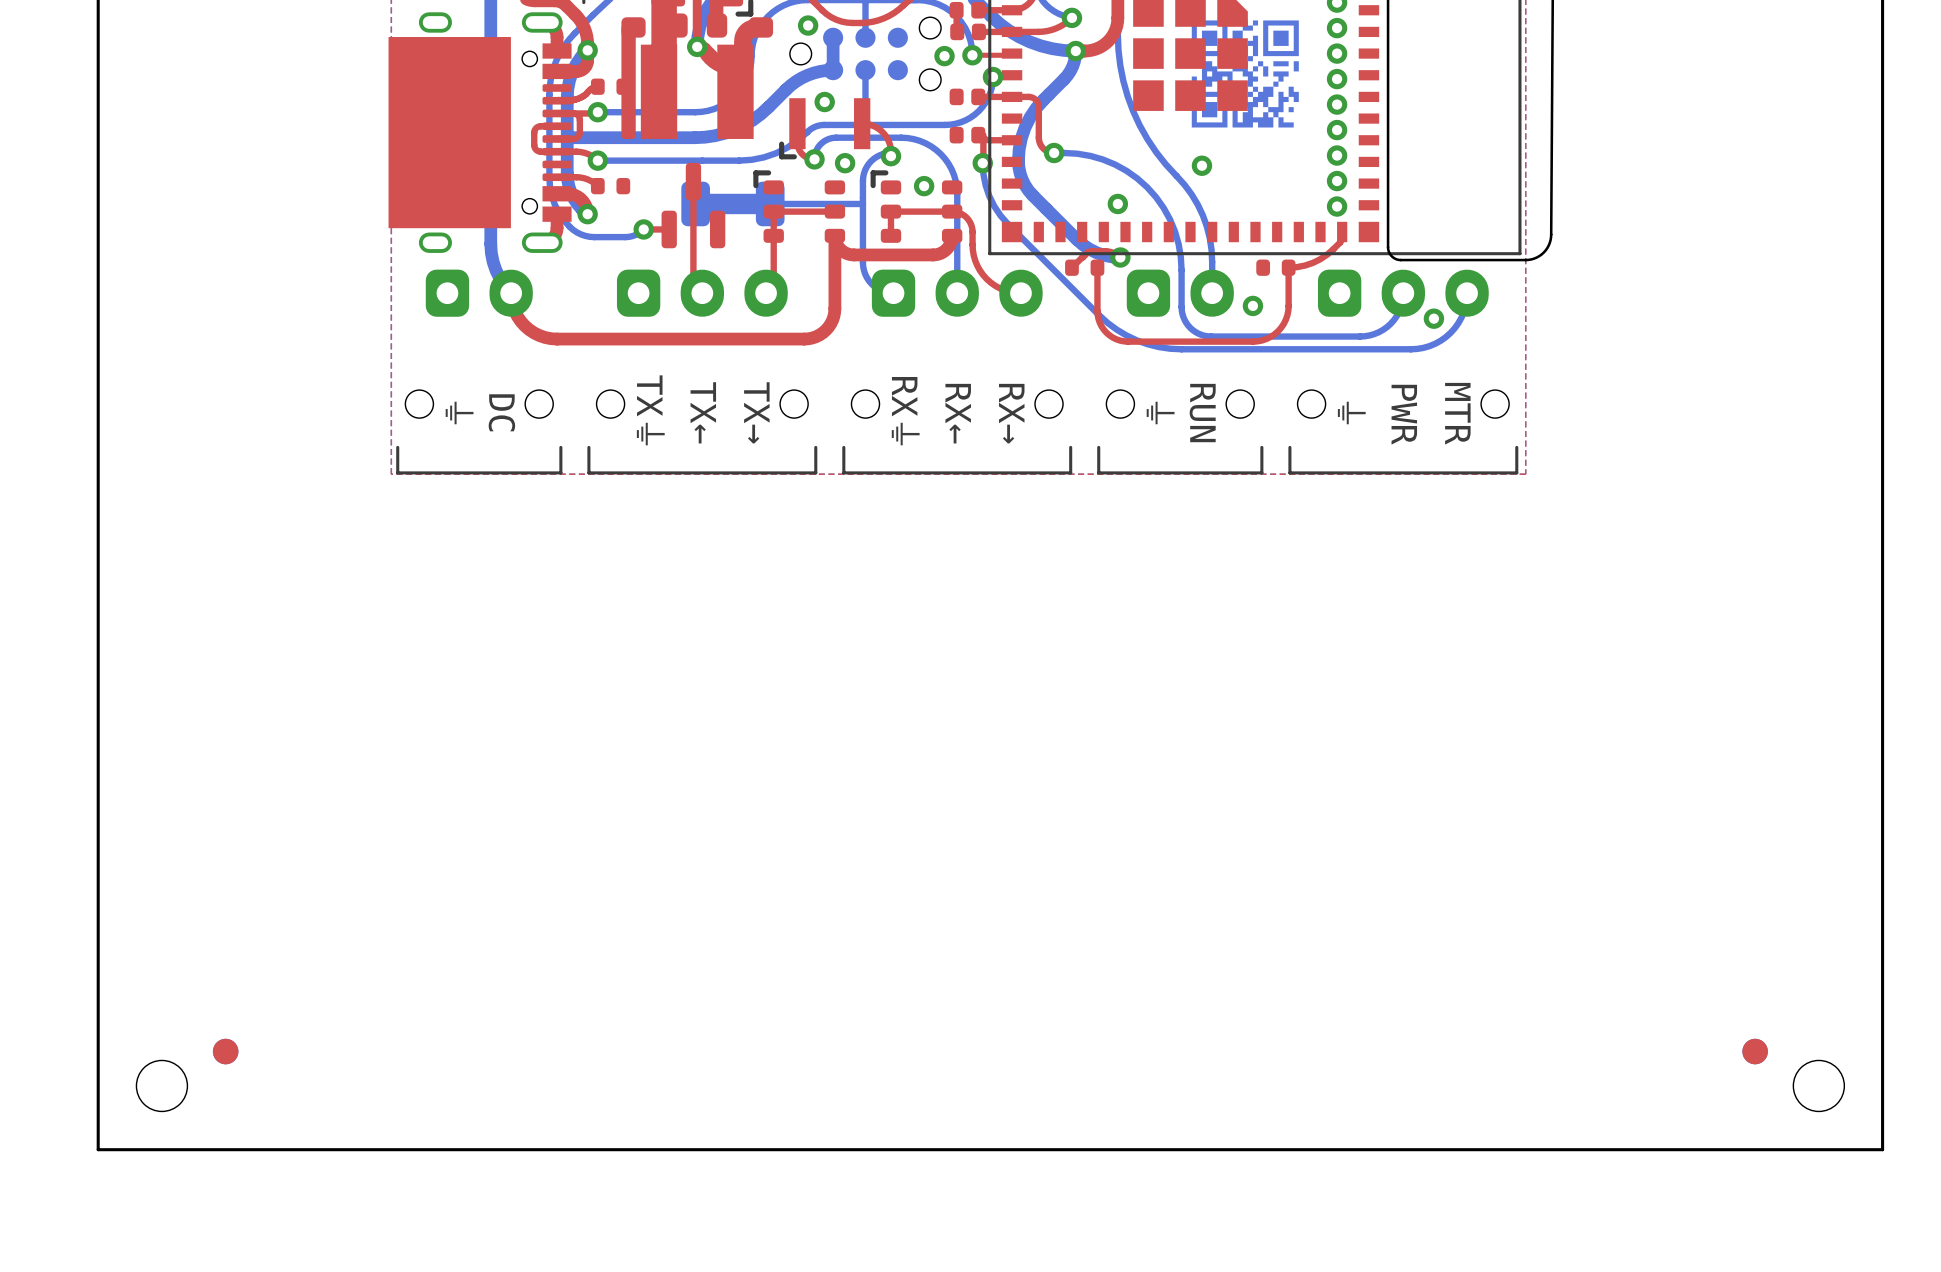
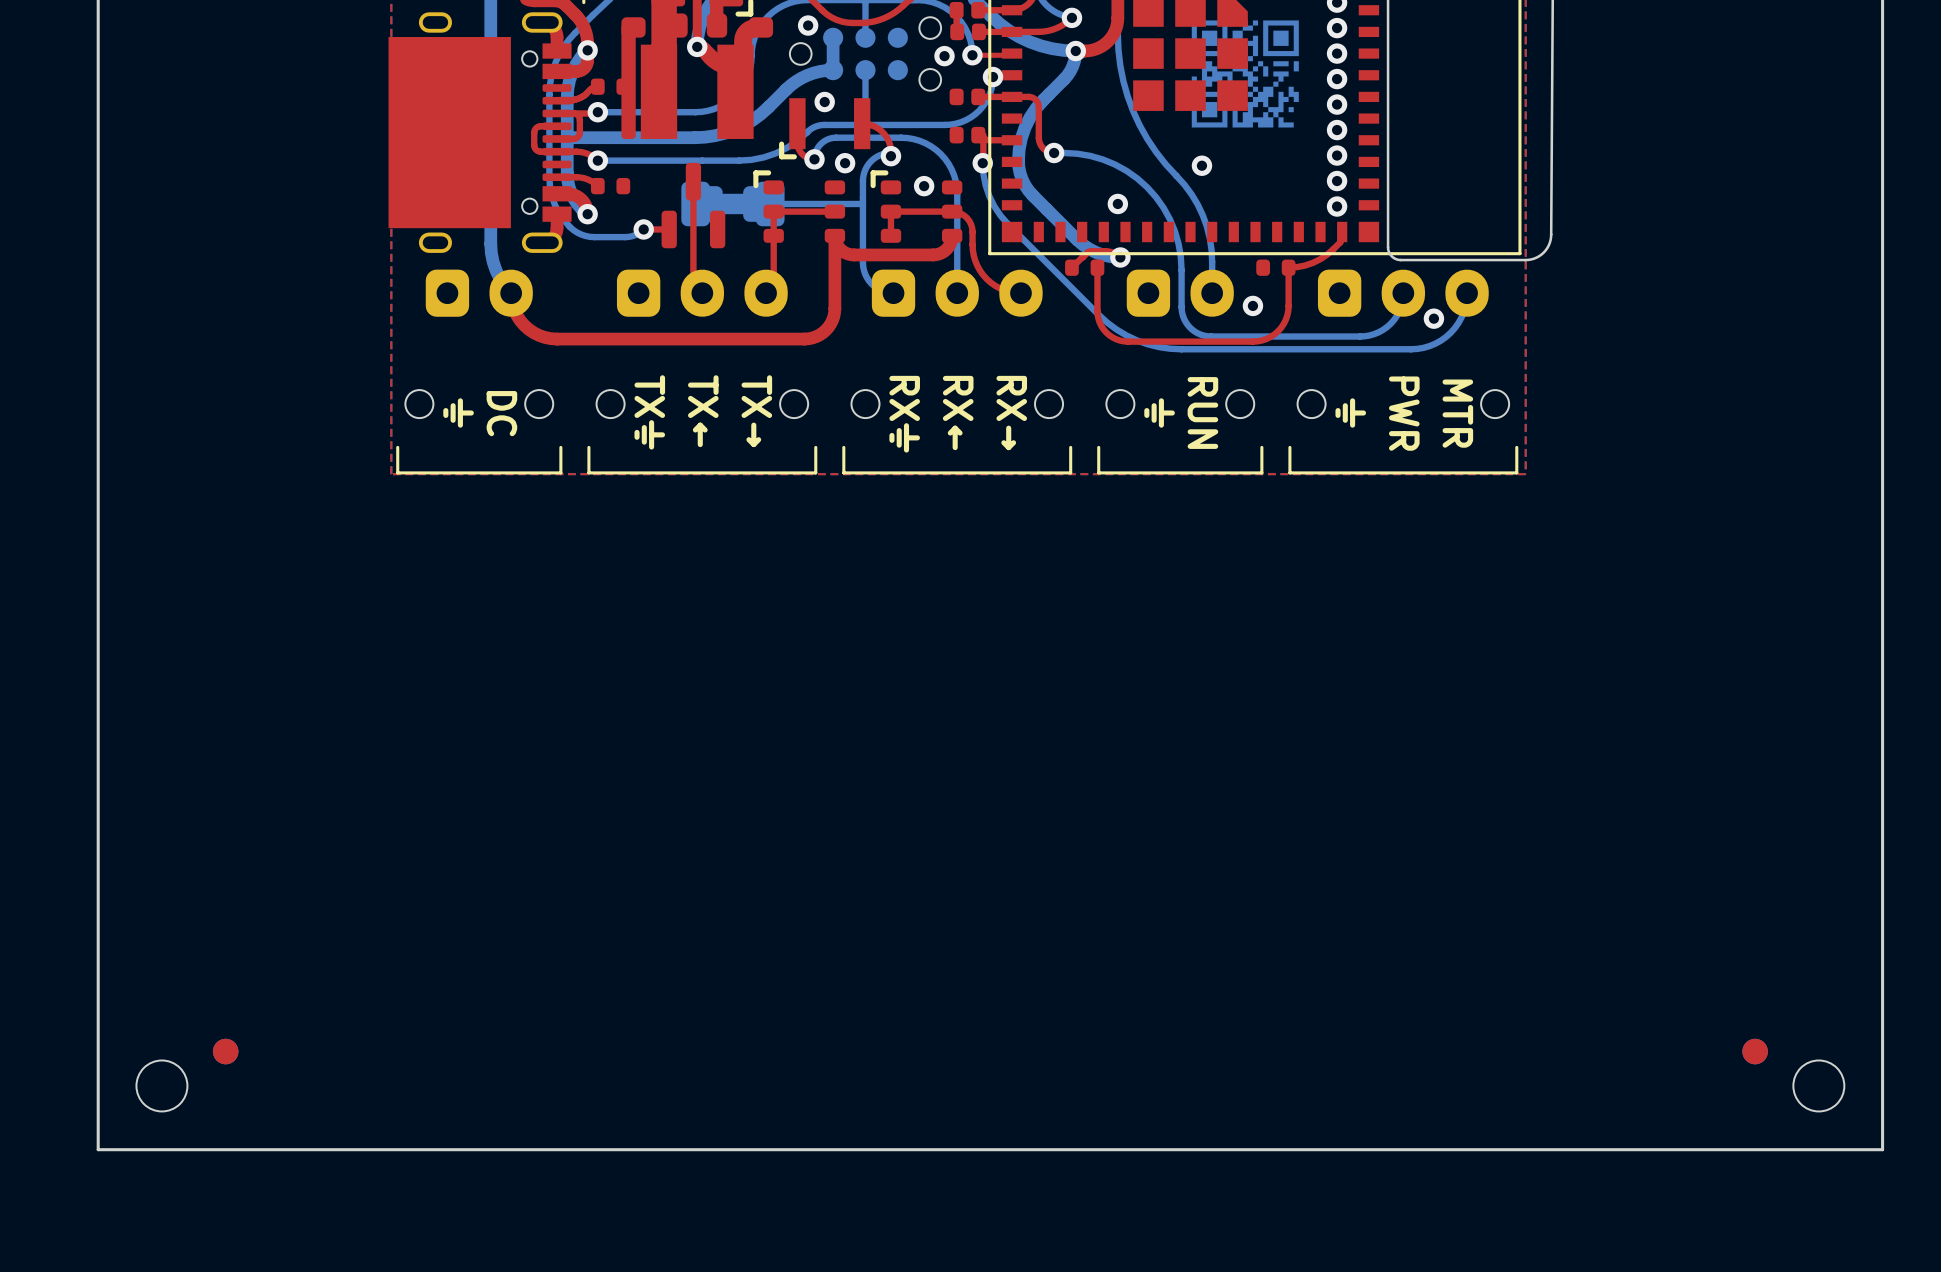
part footprint: [681, 181, 785, 227] -> [681, 181, 785, 227]

